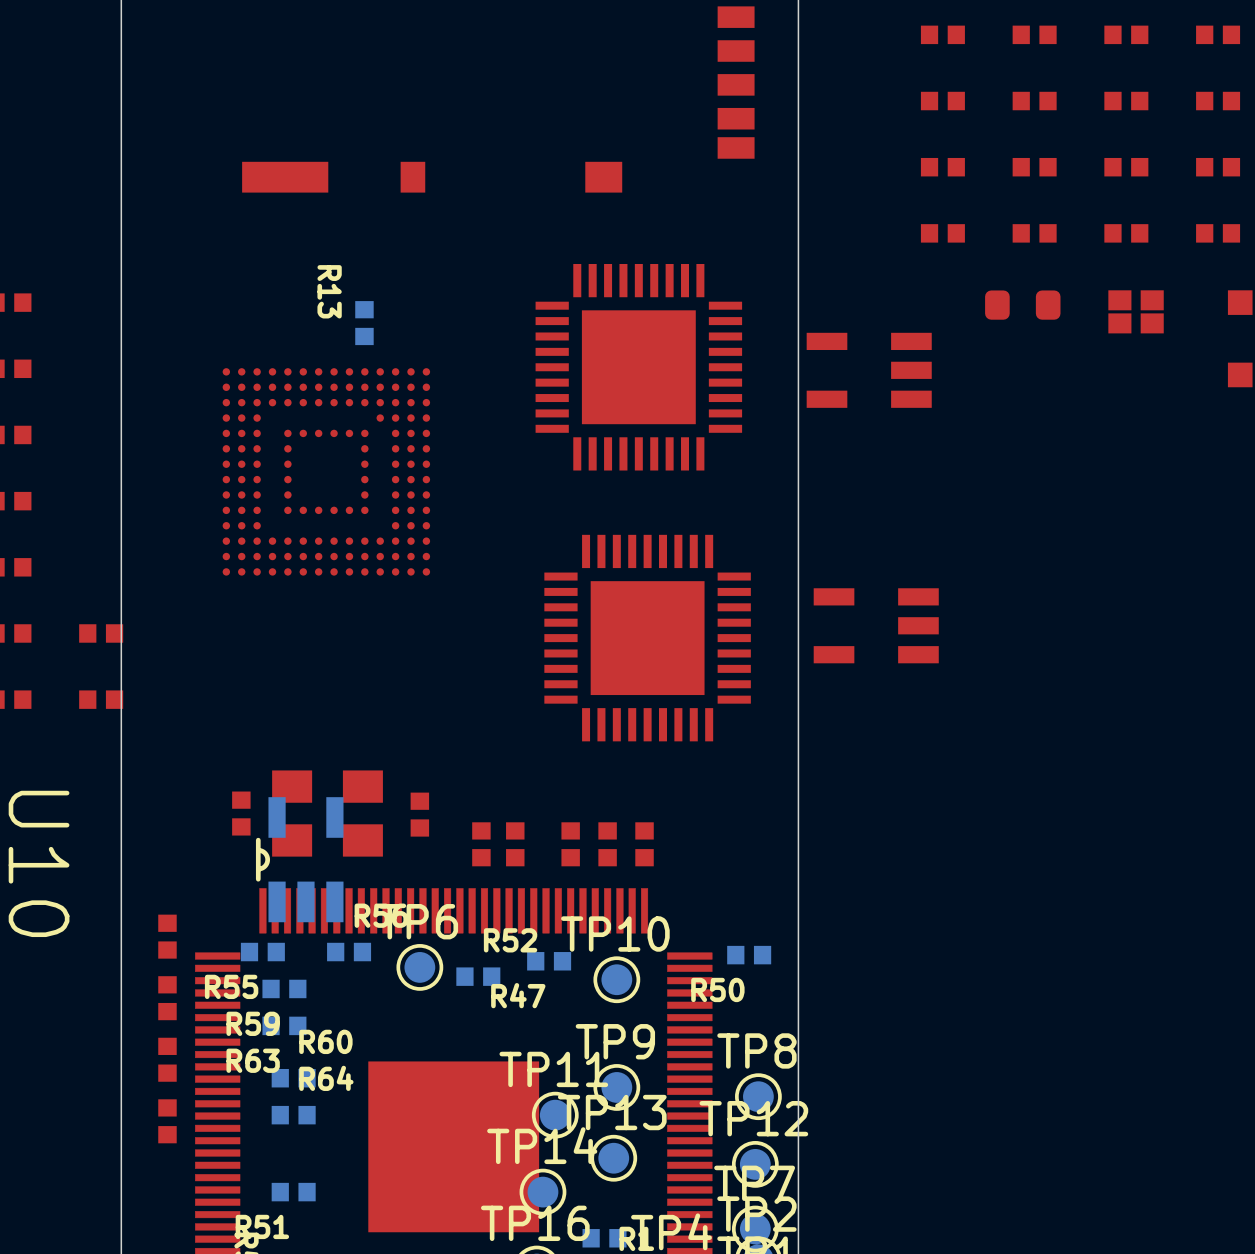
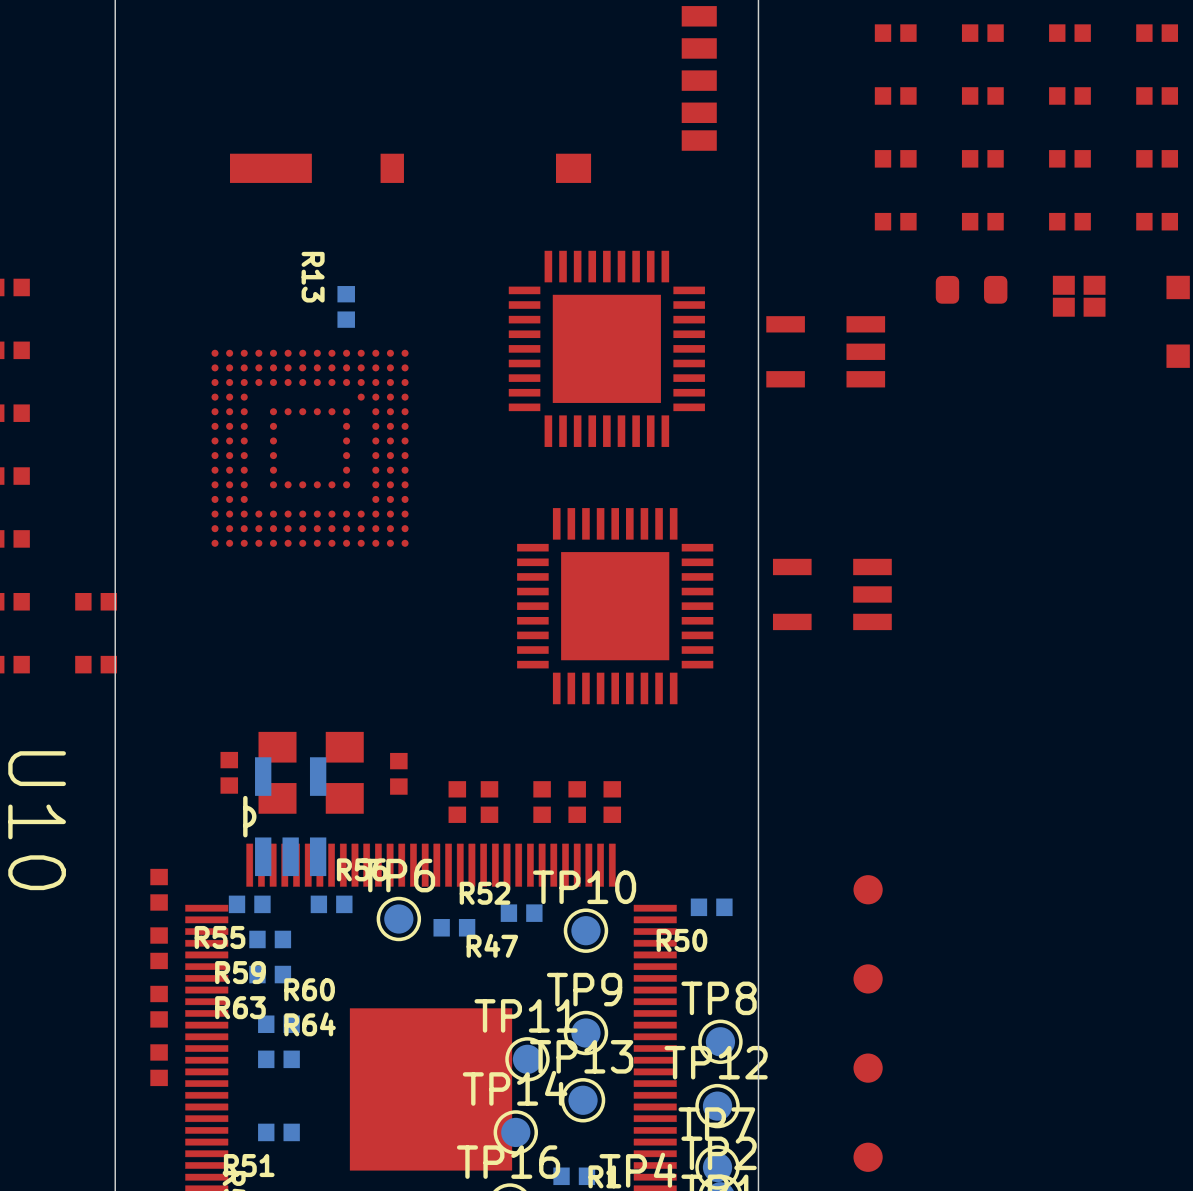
part: none -> (868, 889)
part: none -> (868, 978)
part: none -> (868, 1068)
part: none -> (868, 1157)

